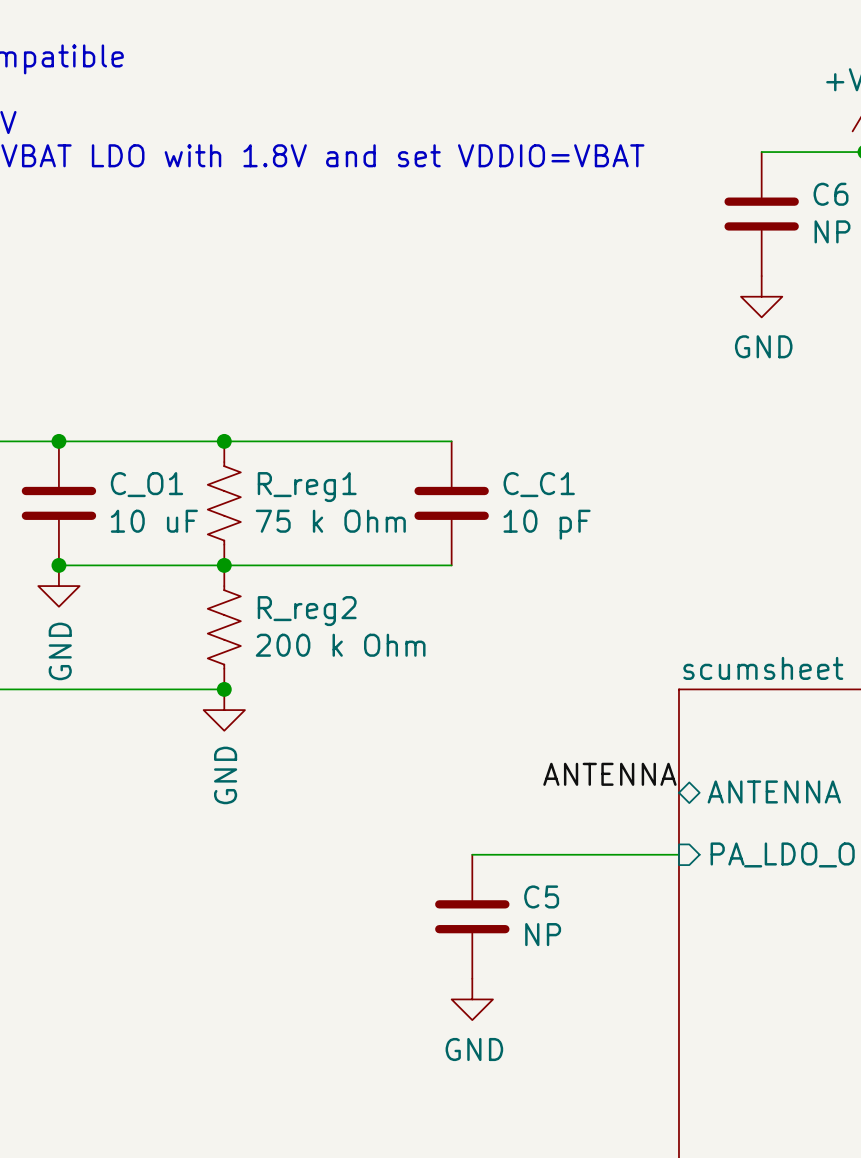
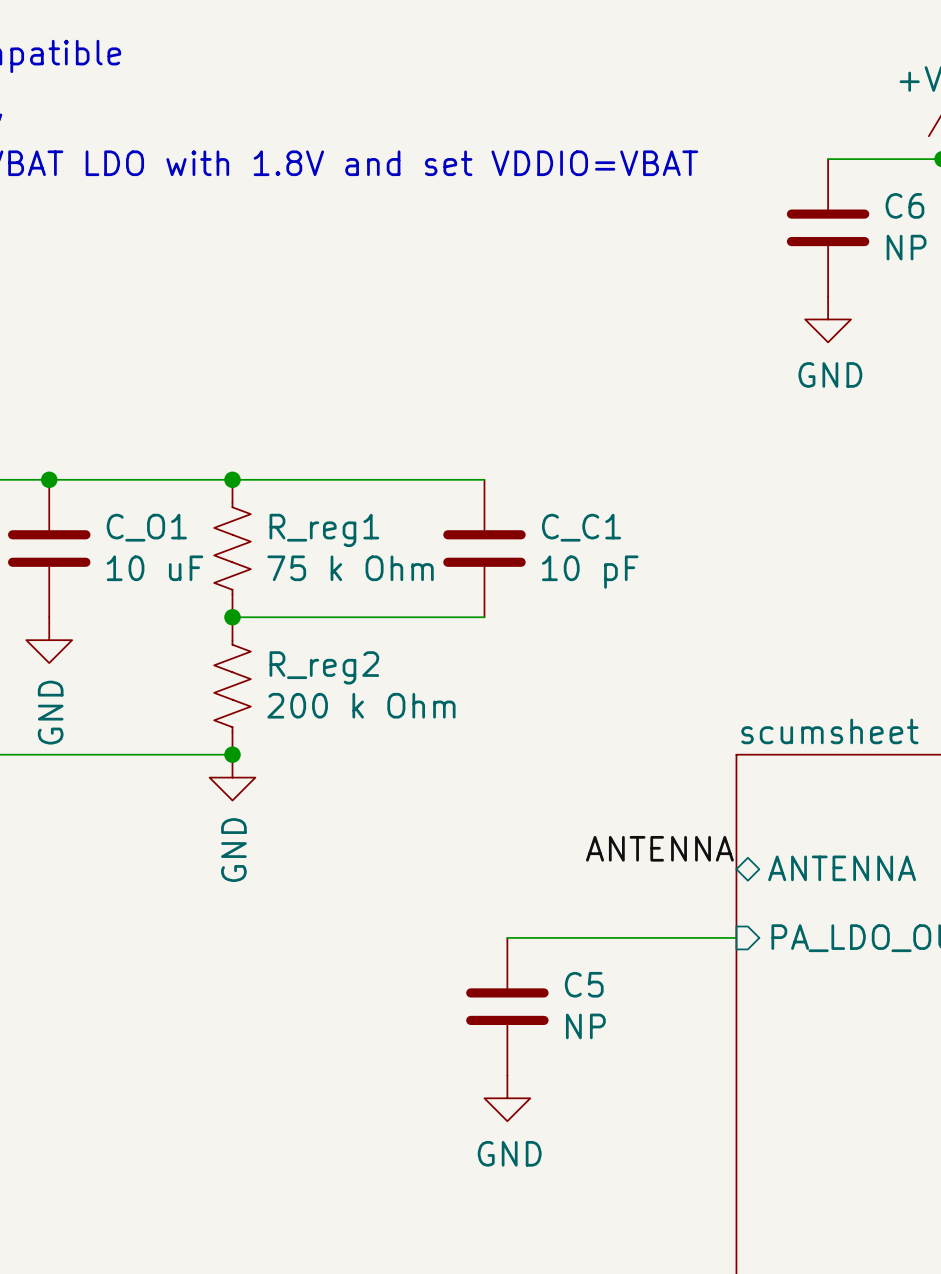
wire: (58, 565) (224, 565) -> none
junction: (58, 565) -> none

